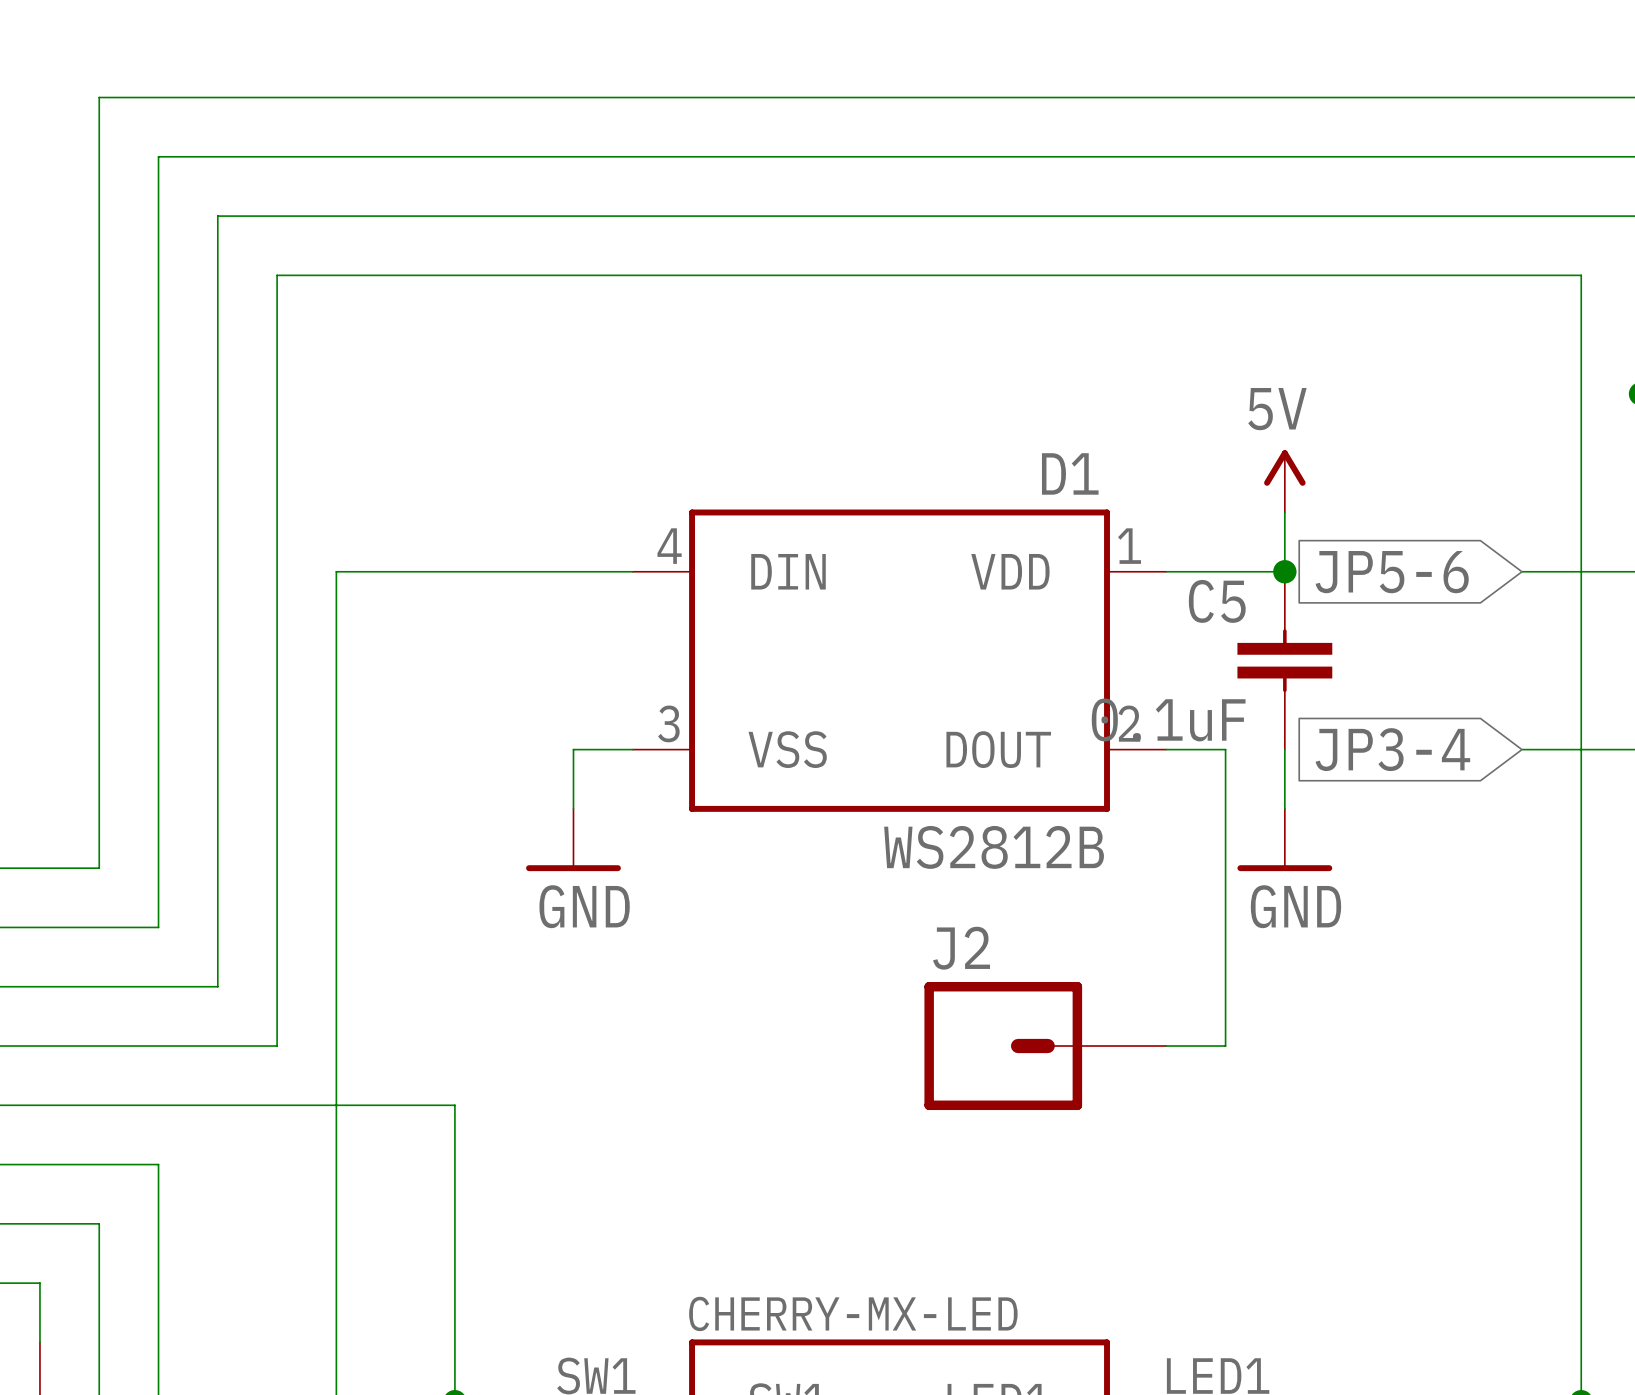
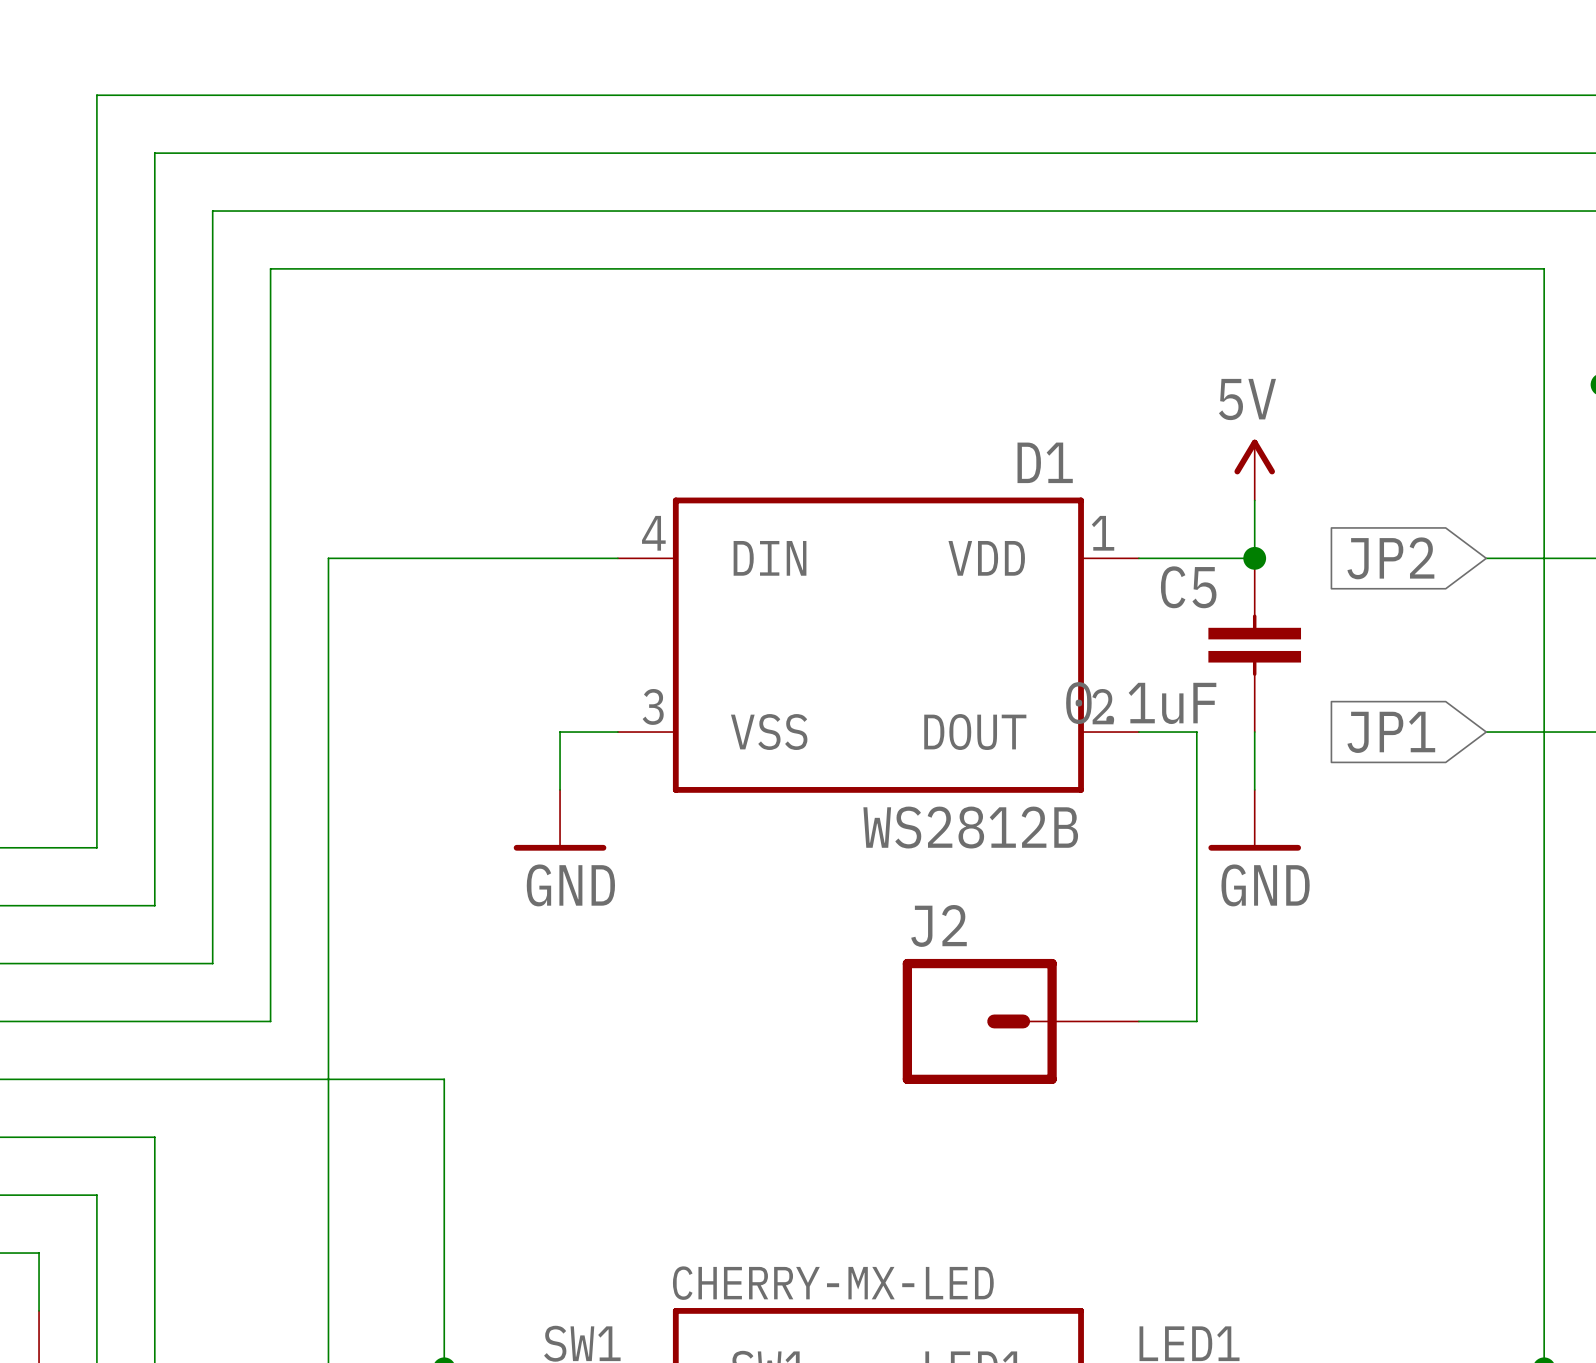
global label: JP5-6 (1392, 572) -> JP2 (1390, 558)
global label: JP3-4 (1392, 749) -> JP1 (1391, 732)

